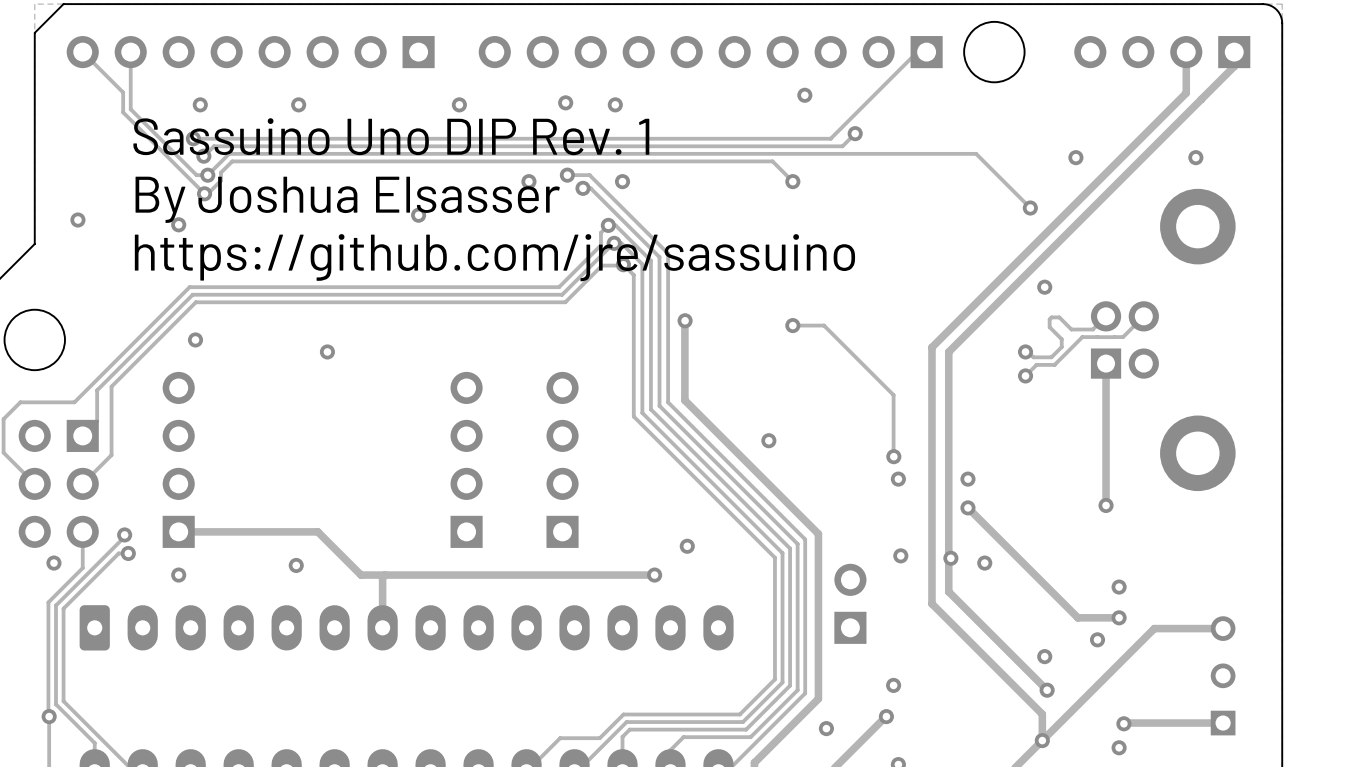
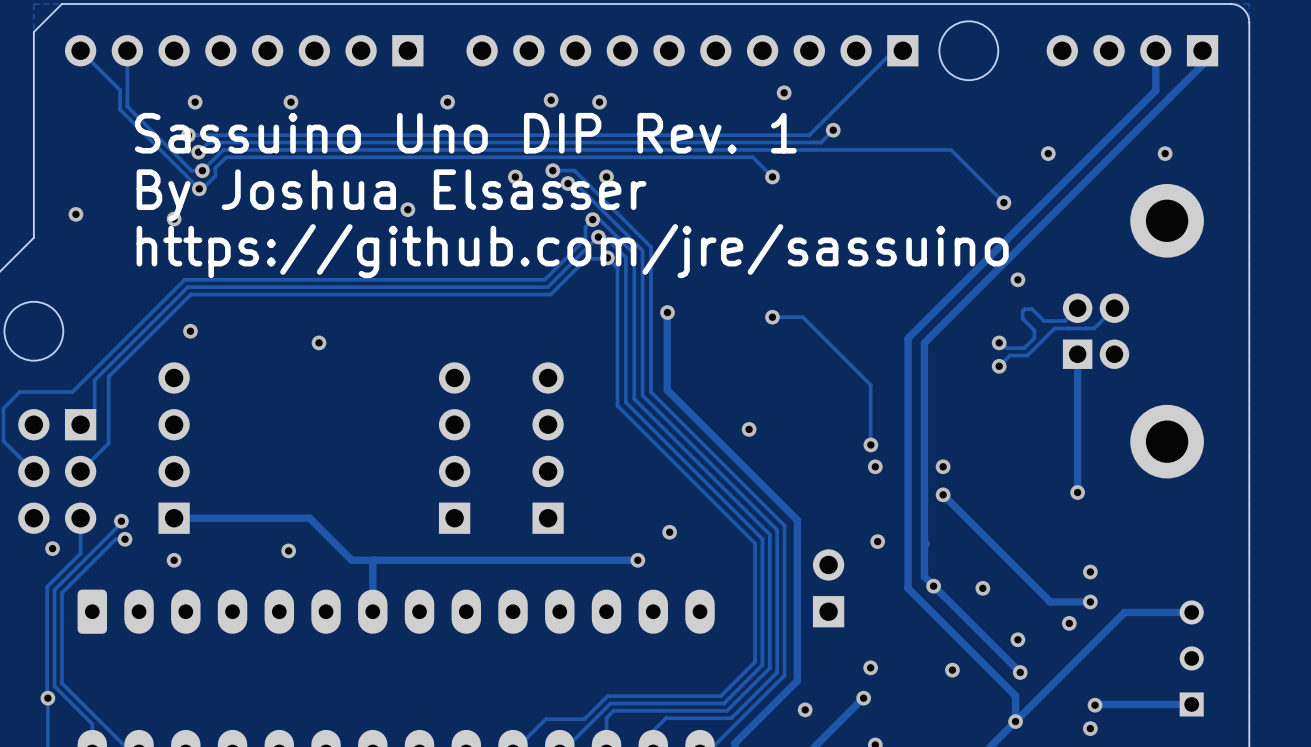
via: (950, 558) -> none
via: (984, 563) -> none
via: none -> (933, 586)
via: none -> (982, 588)
via: none -> (952, 670)

